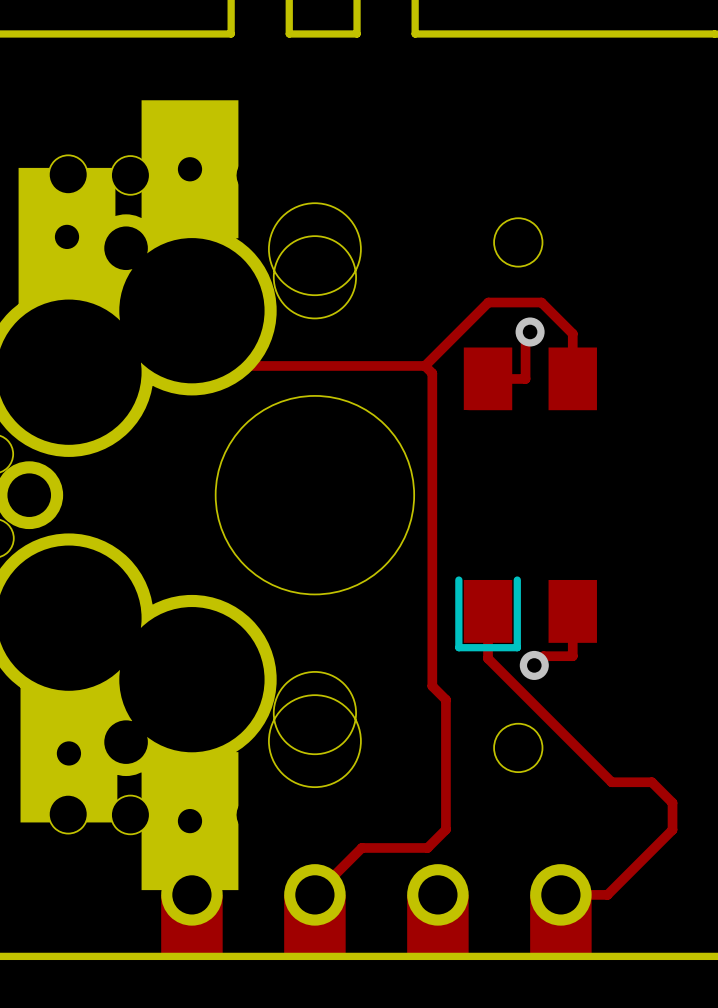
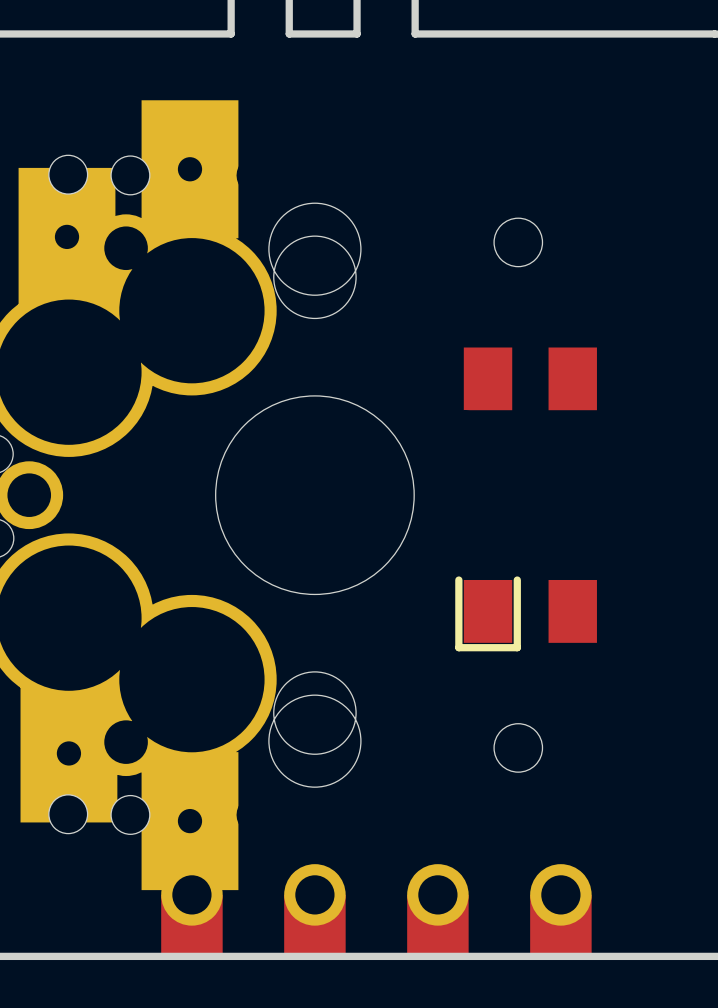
track: (189, 169) (189, 308) (247, 365) (424, 365) -> none
track: (530, 331) (525, 336) (525, 378) (488, 378) -> none
via: (530, 331) -> none
track: (424, 365) (432, 373) (432, 686) (445, 699) (445, 829) (427, 847) (361, 847) (314, 894) (314, 925) -> none
track: (424, 365) (488, 302) (541, 302) (572, 333) (572, 378) -> none
track: (488, 611) (488, 658) (611, 782) (651, 782) (672, 802) (672, 829) (607, 894) (560, 894) (560, 925) -> none
track: (572, 611) (572, 656) (543, 656) (534, 665) -> none
via: (534, 665) -> none

